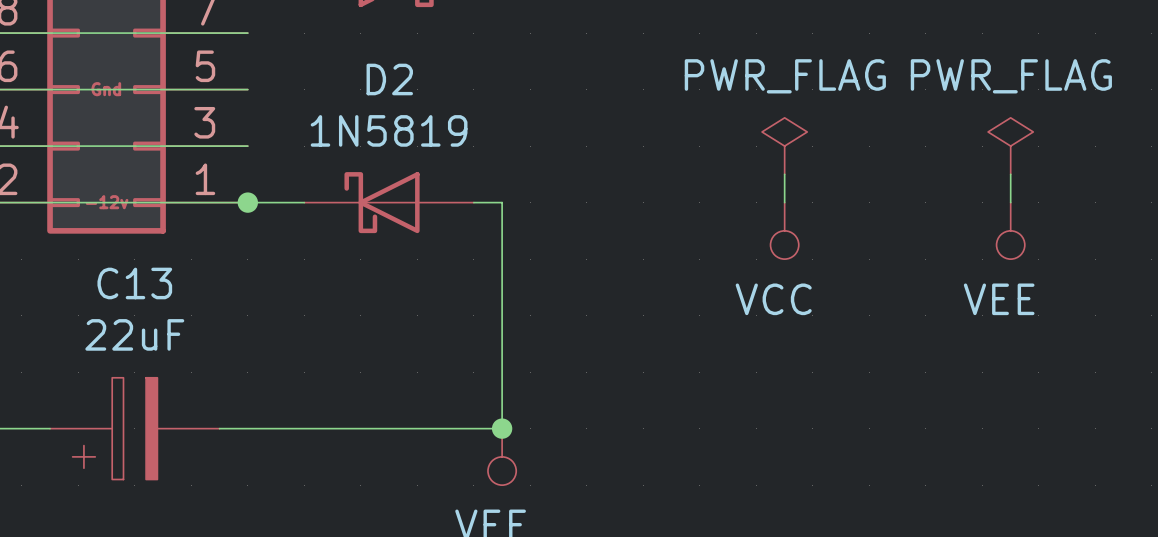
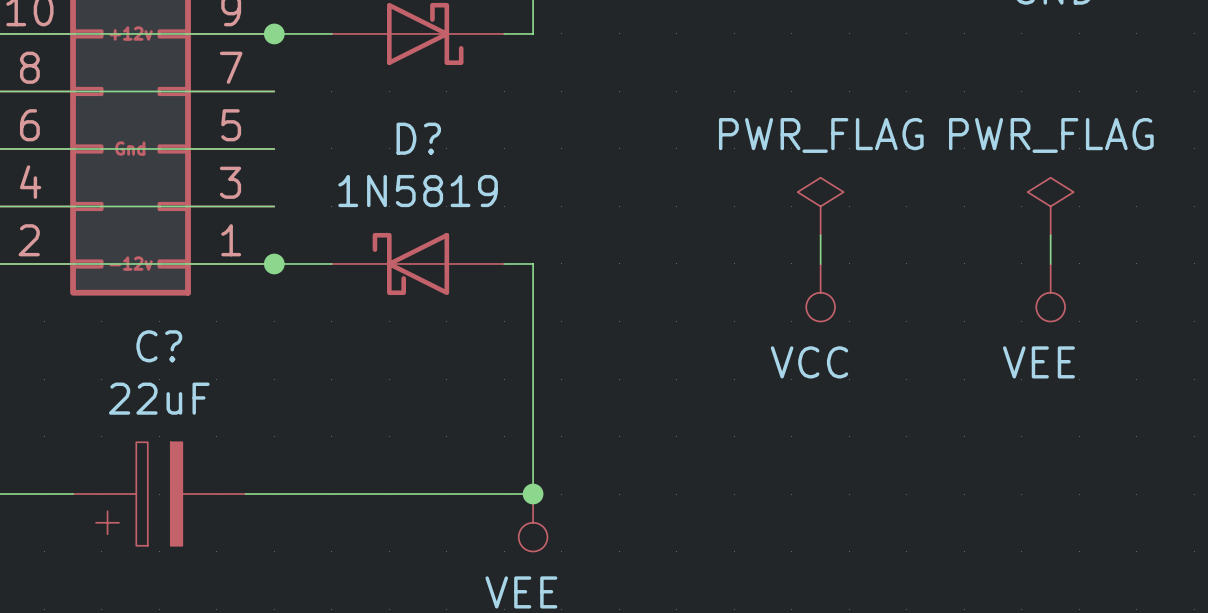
D2 name: D2 (389, 79) -> D? (418, 138)
C13 name: C13 (134, 283) -> C? (159, 346)

